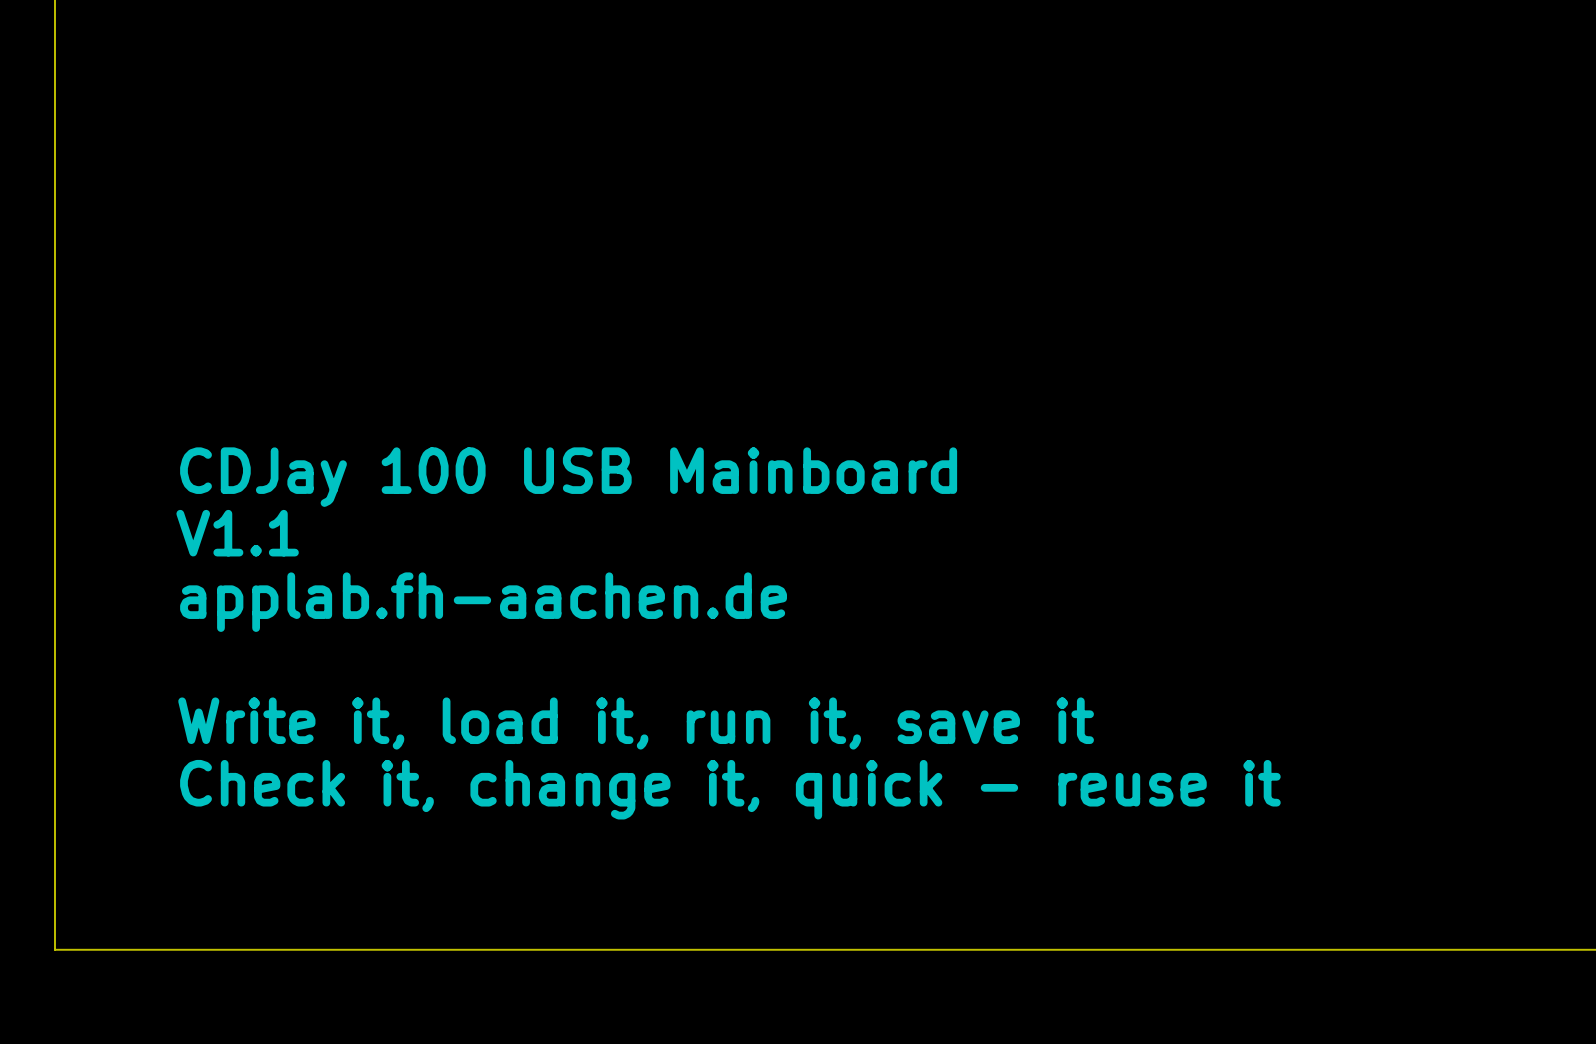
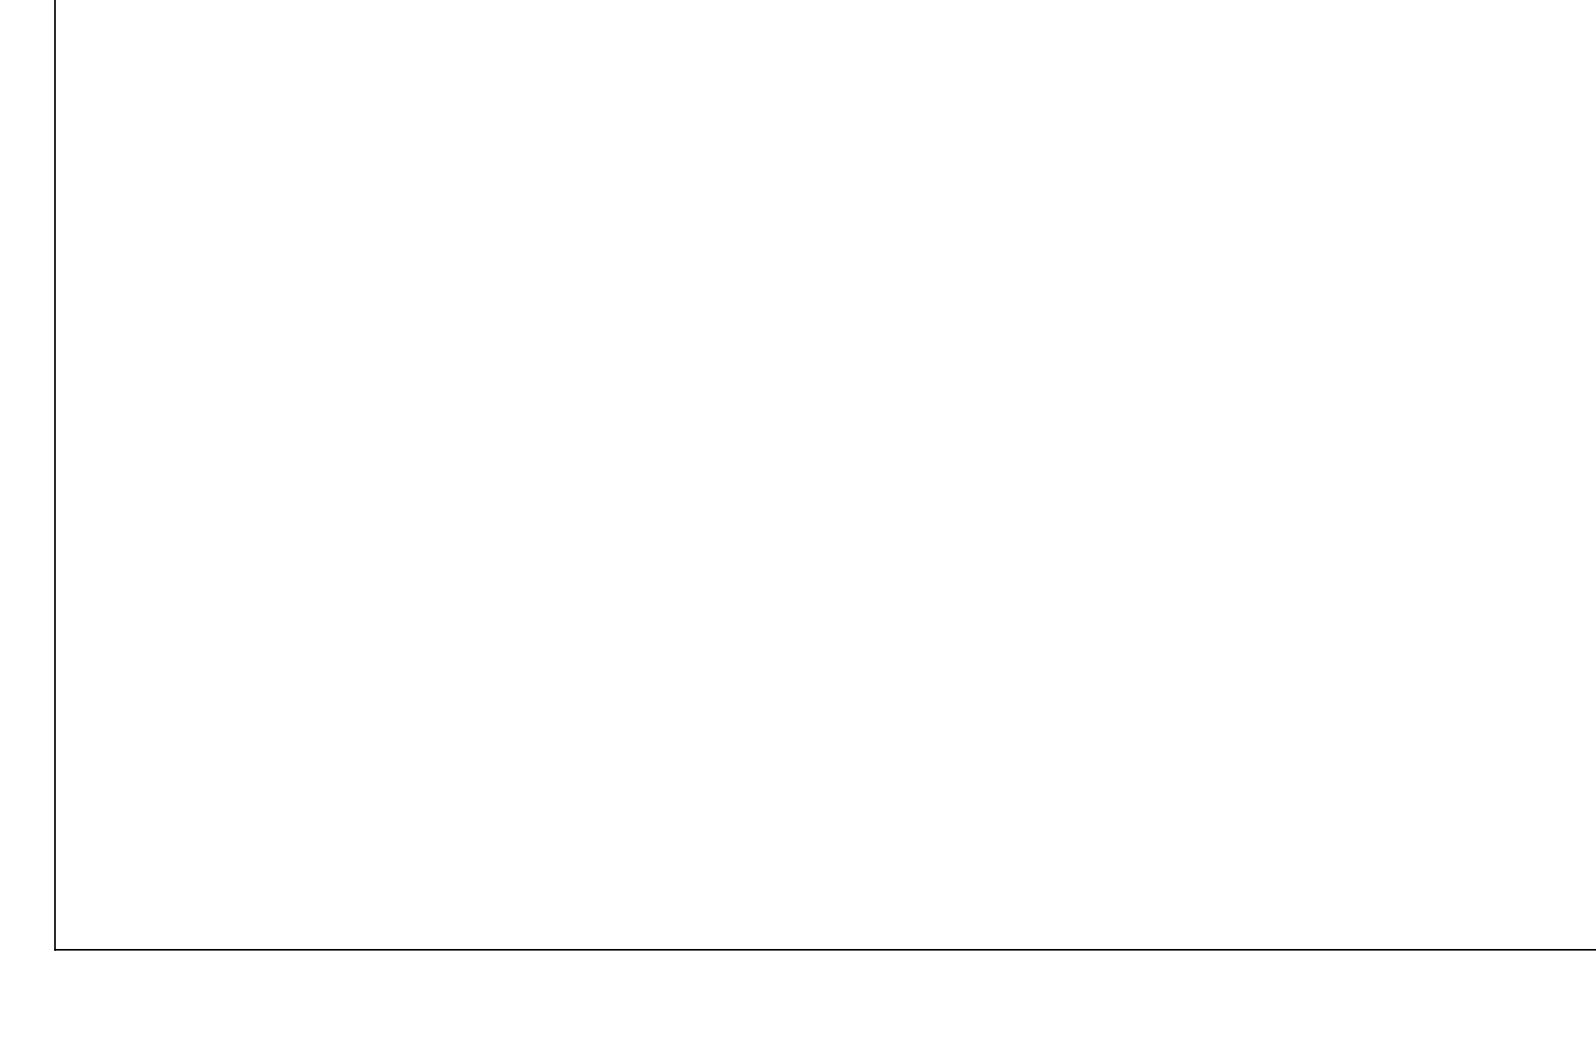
text: CDJay 100 USB Mainboard (568, 477) -> none
text: V1.1 (237, 533) -> none
text: applab.fh-aachen.de (483, 602) -> none
text: Write it, load it, run it, save it (636, 723) -> none
text: Check it, change it, quick - reuse it (730, 789) -> none

